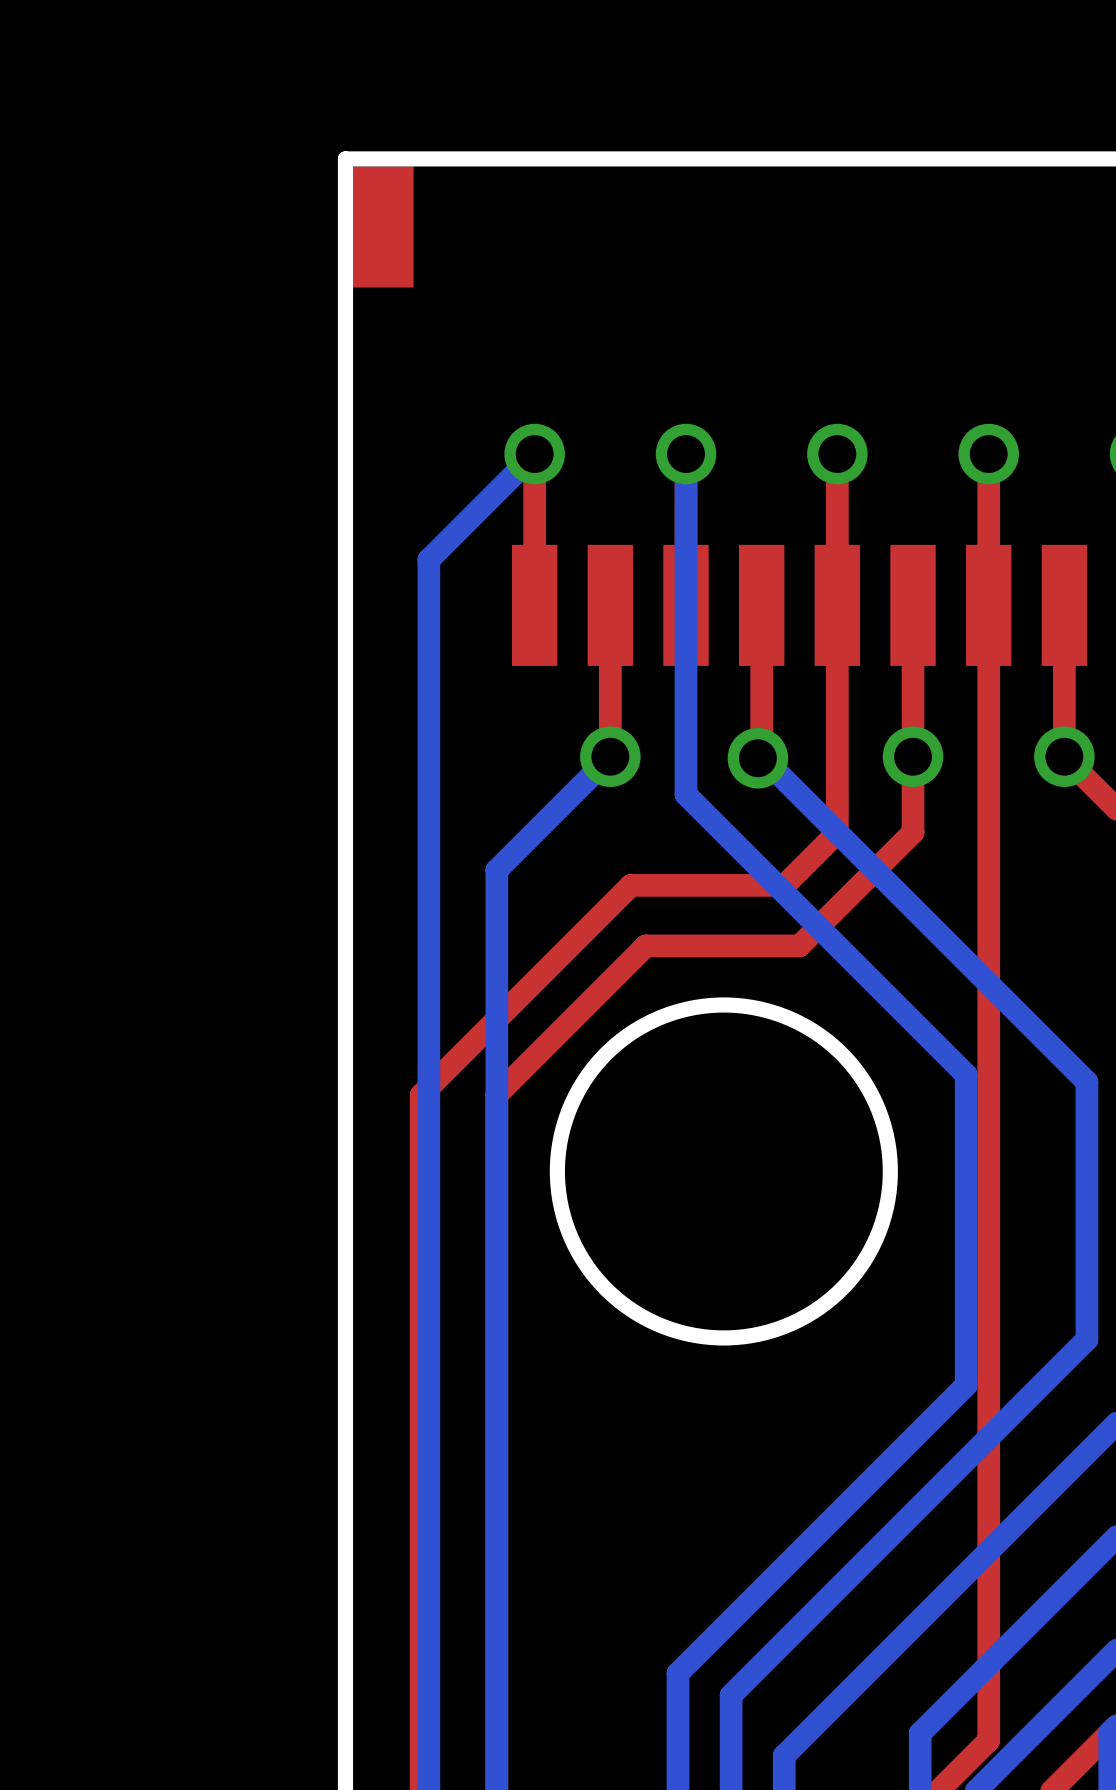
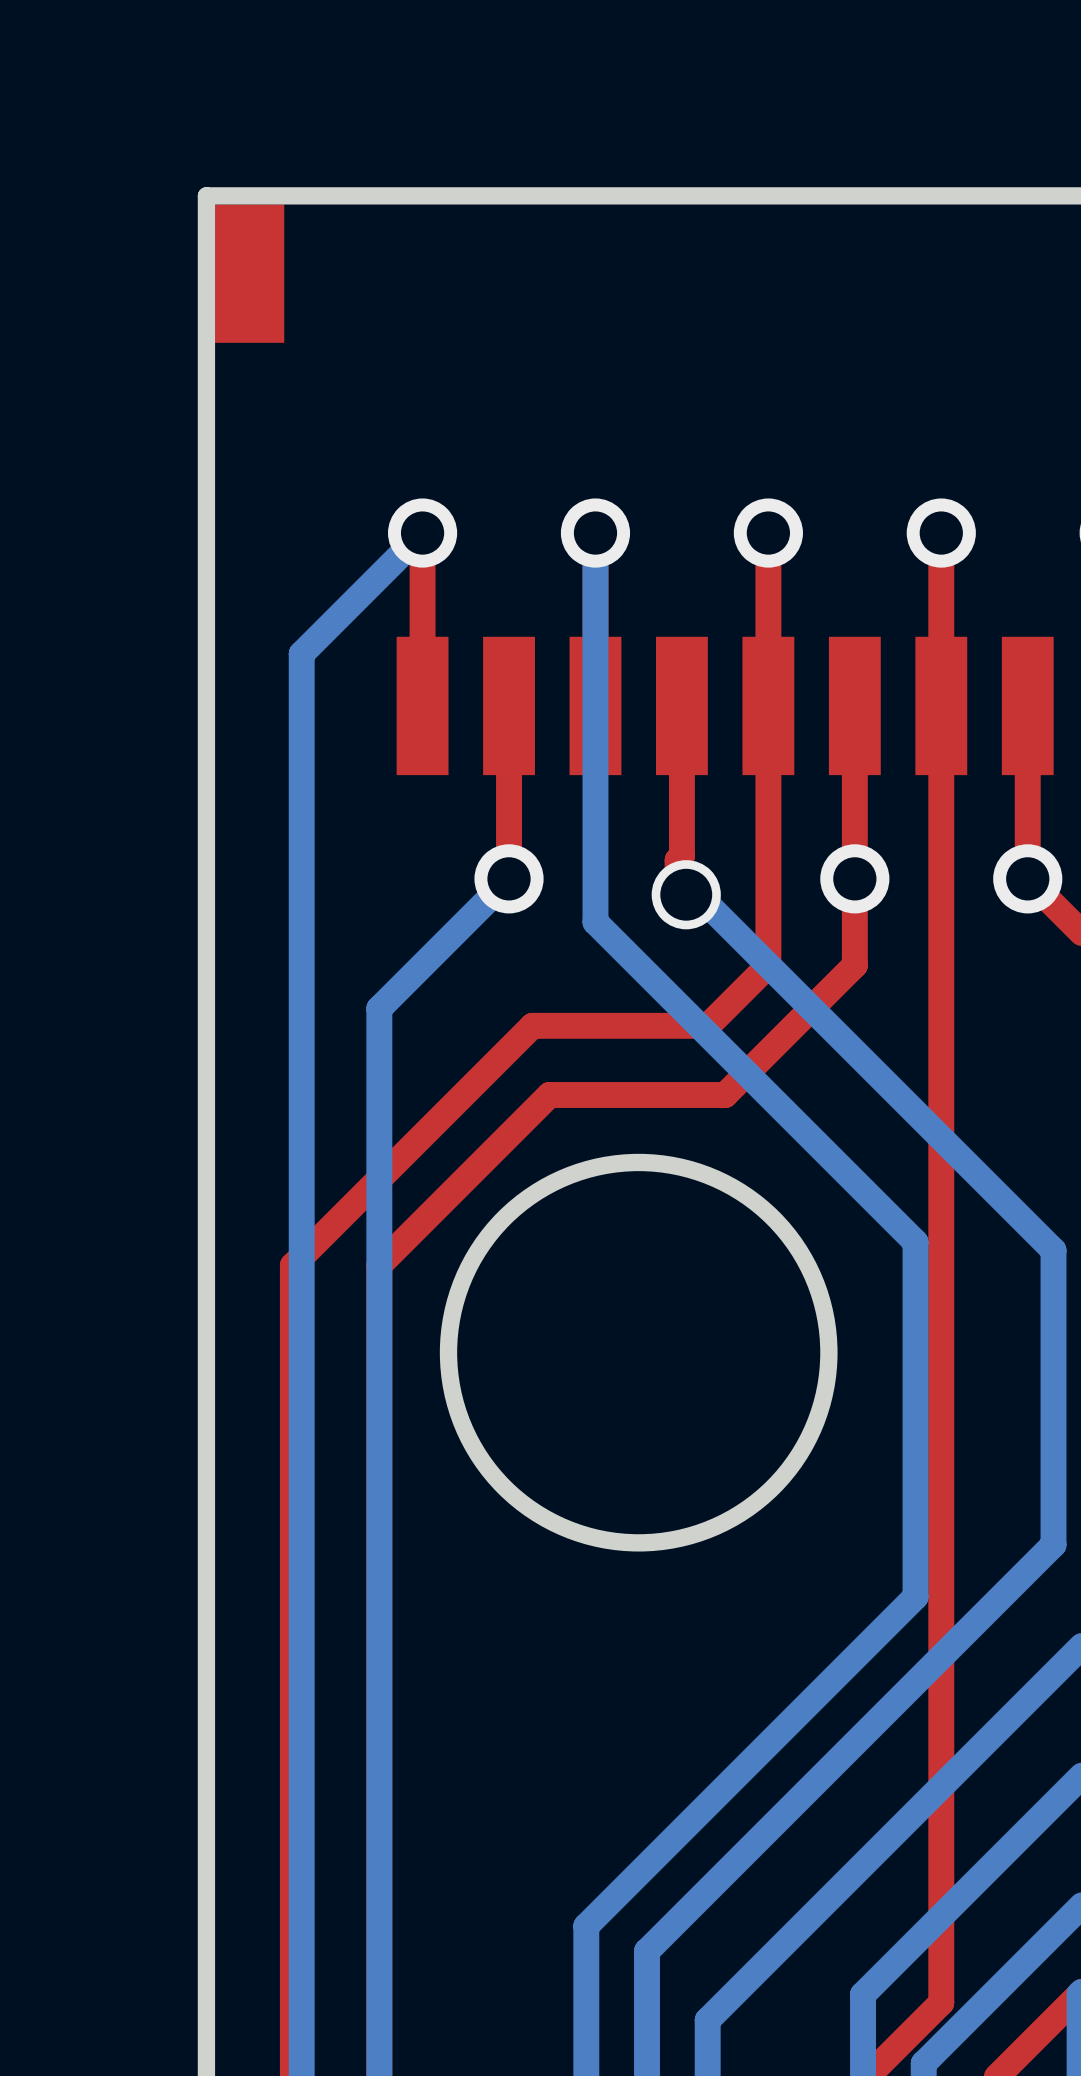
via position: (757, 758) -> (686, 894)

